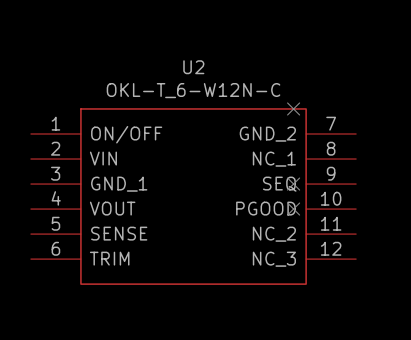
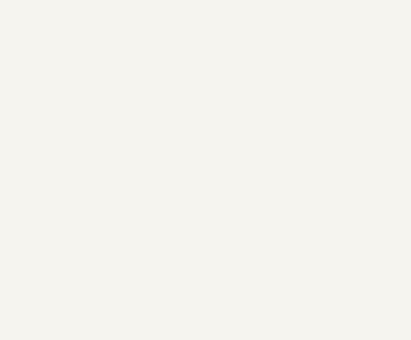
no-connect mark: (293, 108) -> none
no-connect mark: (293, 184) -> none
U2: OKL-T_6-W12N-C (193, 196) -> none
no-connect mark: (293, 209) -> none

